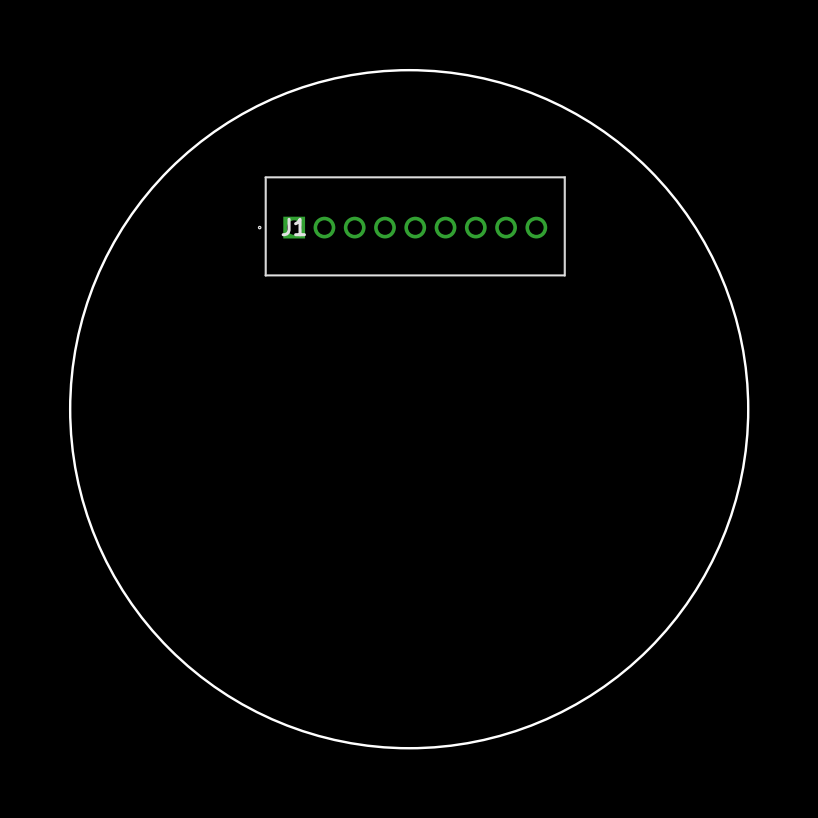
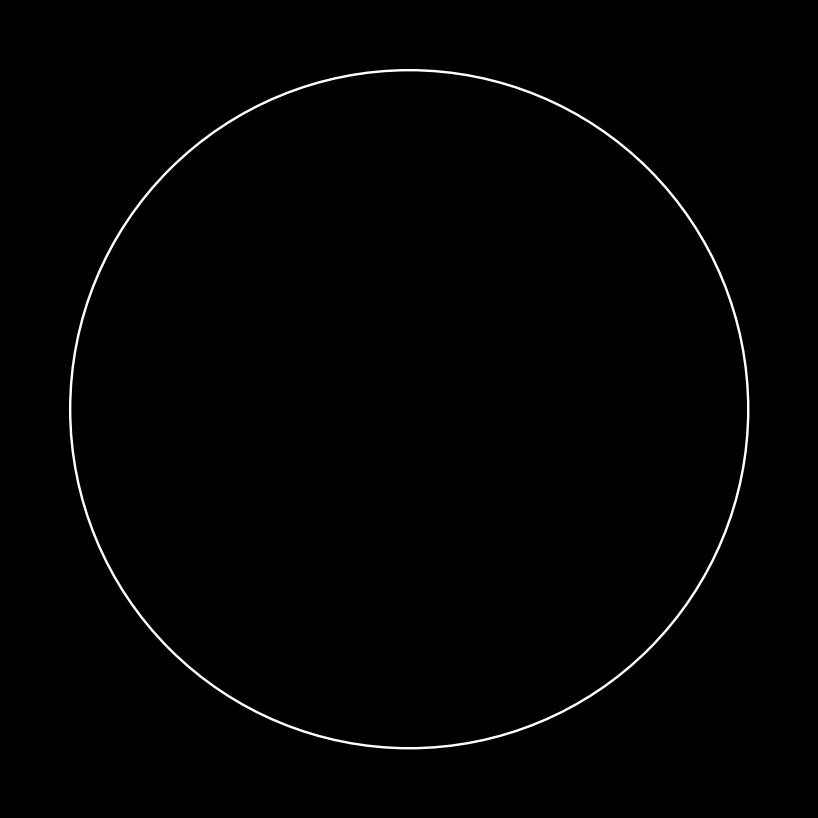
J1: (411, 226) -> none

